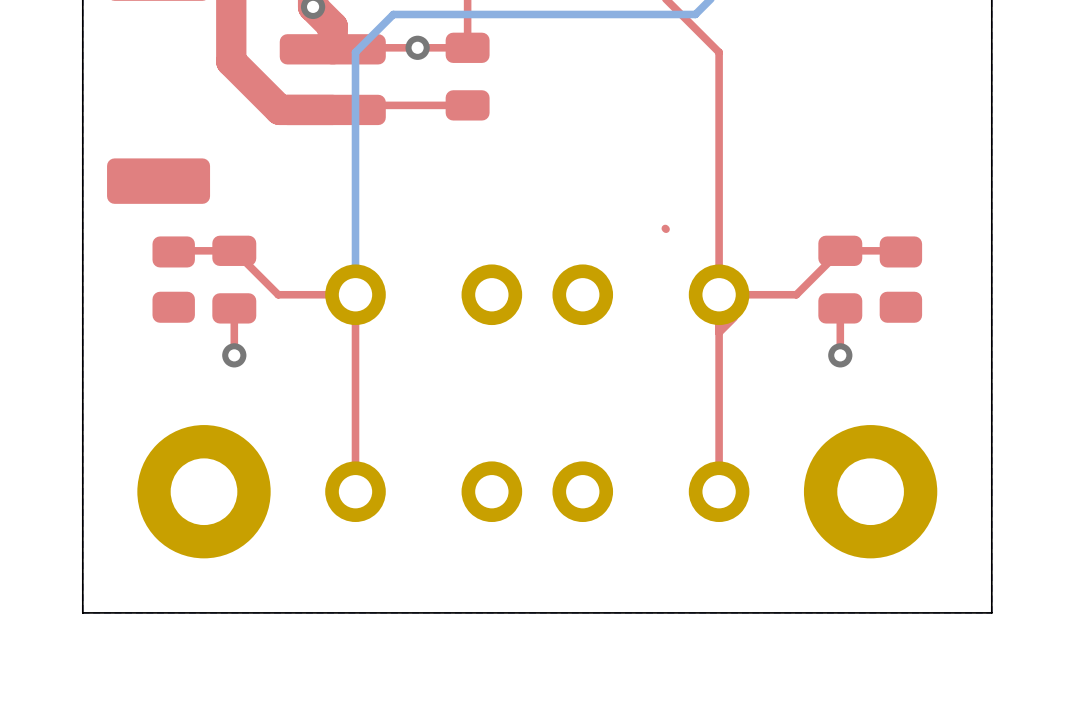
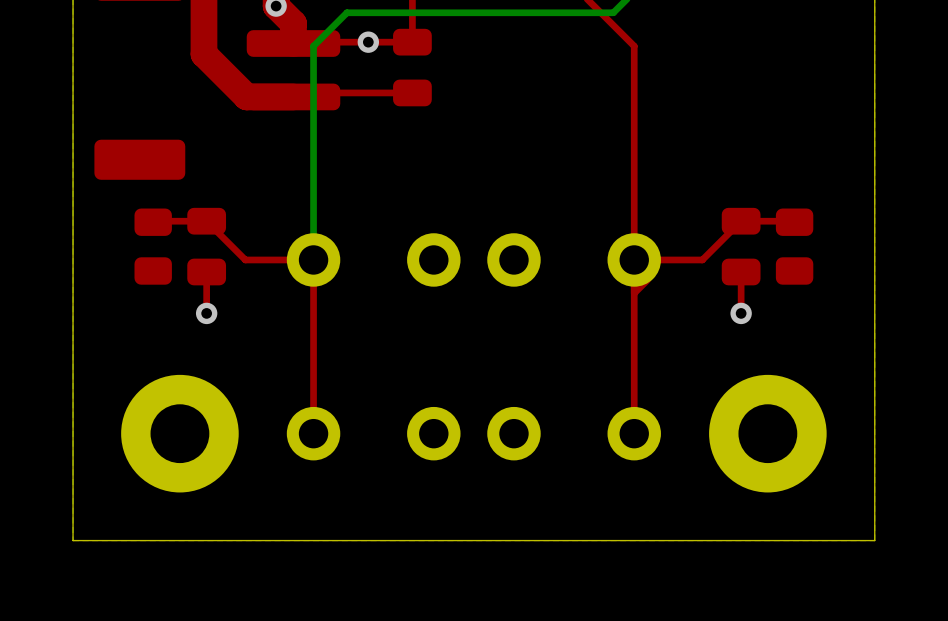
top track: (665, 228) (666, 229) -> none

